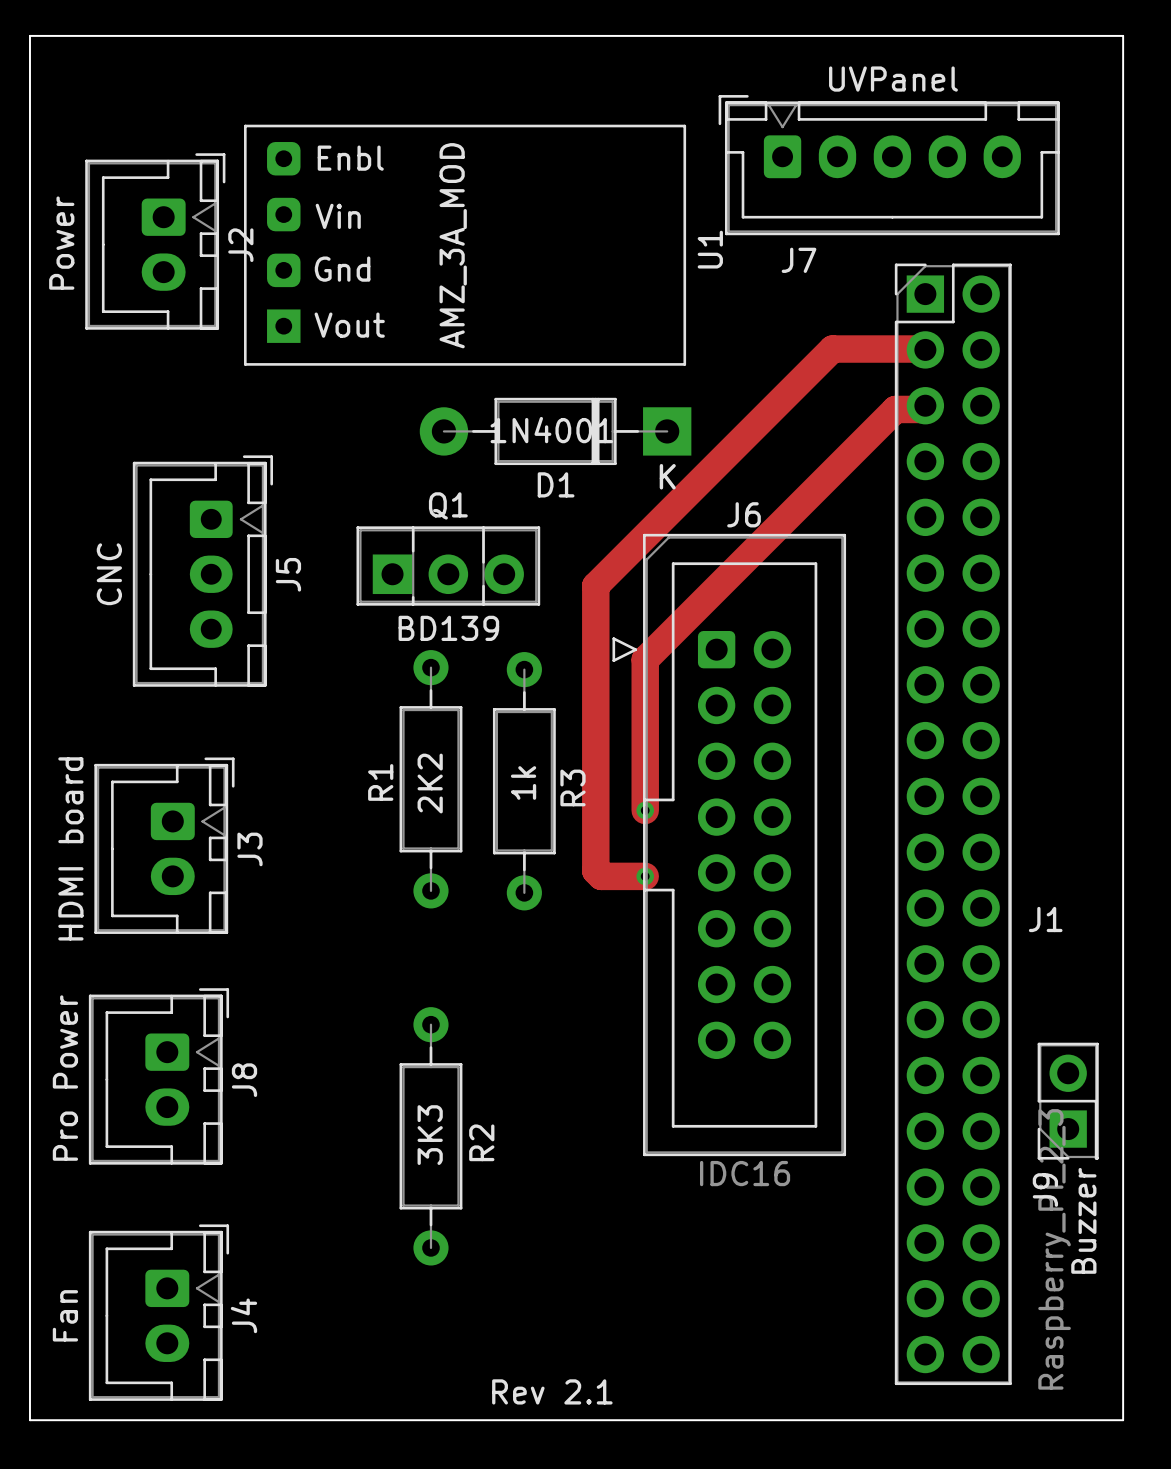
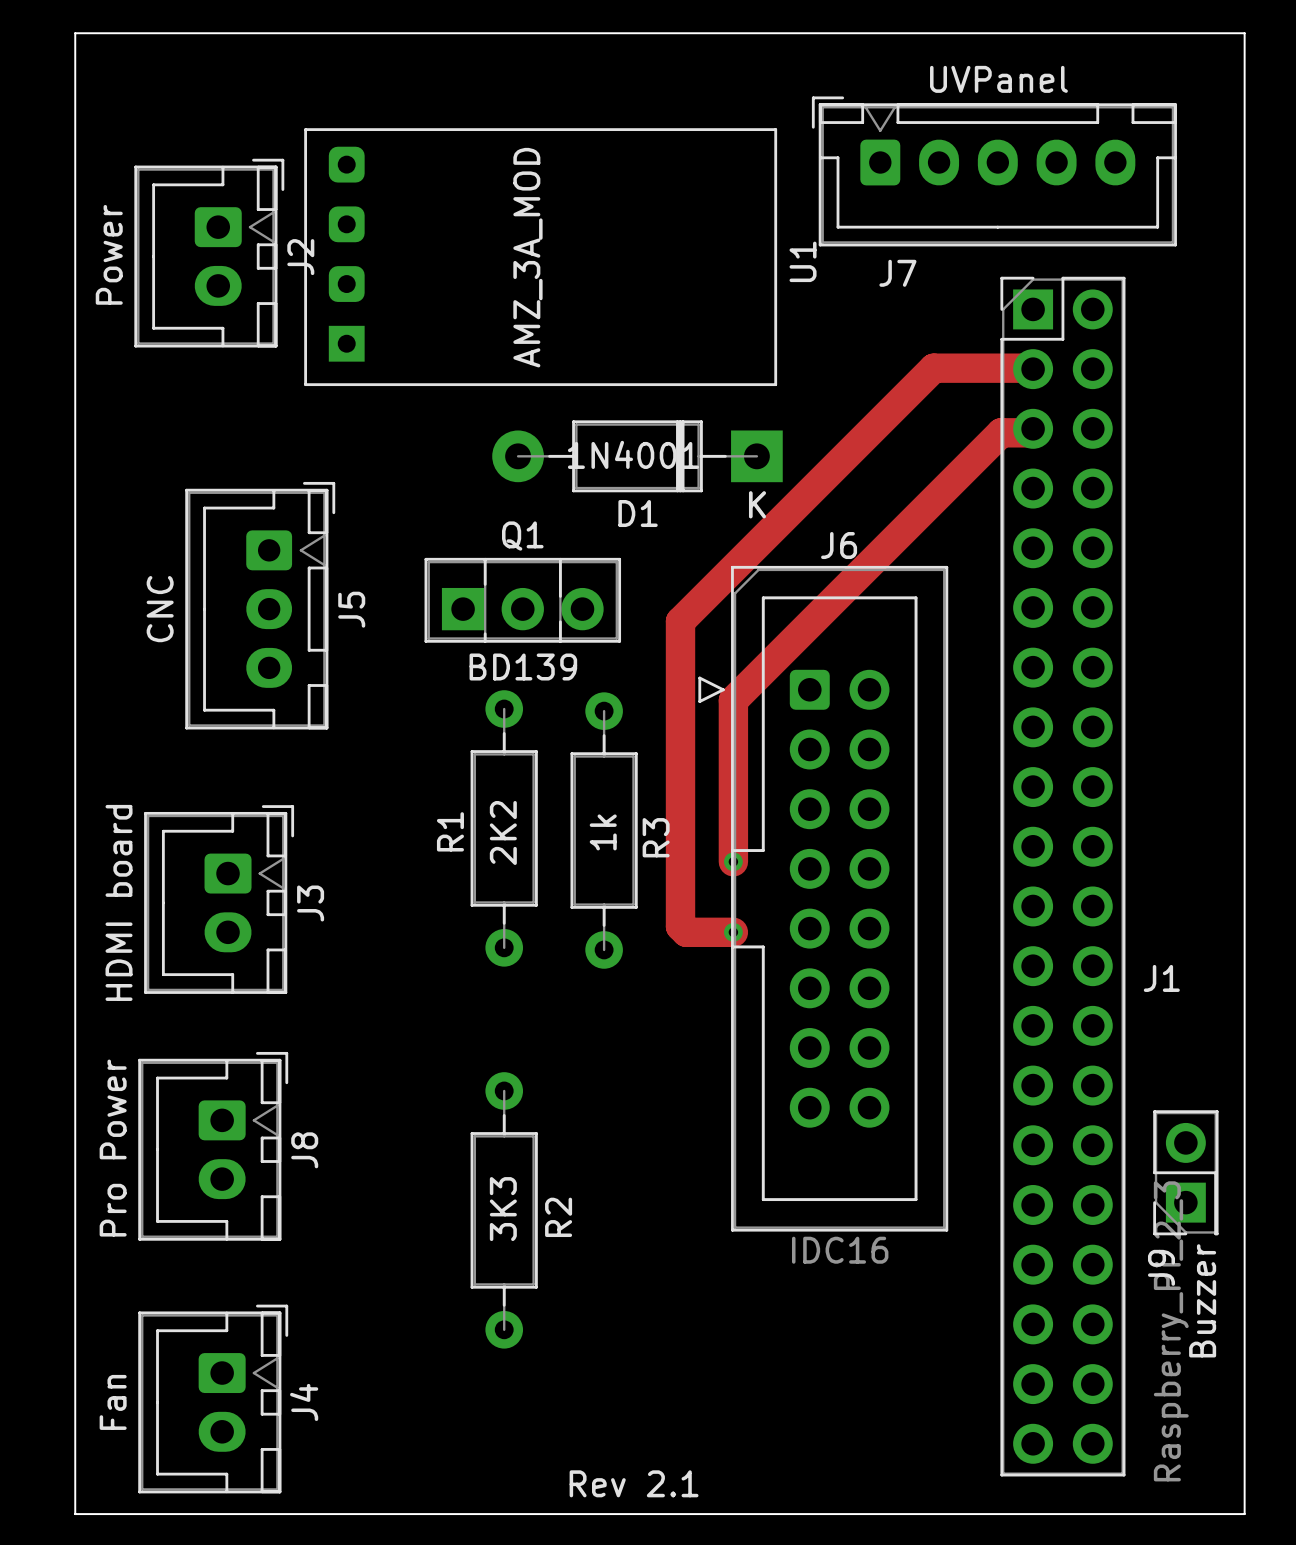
U1 text: Enbl (350, 158) -> none
U1 text: Vin (338, 216) -> none
U1 text: Gnd (342, 269) -> none
U1 text: Vout (349, 325) -> none

